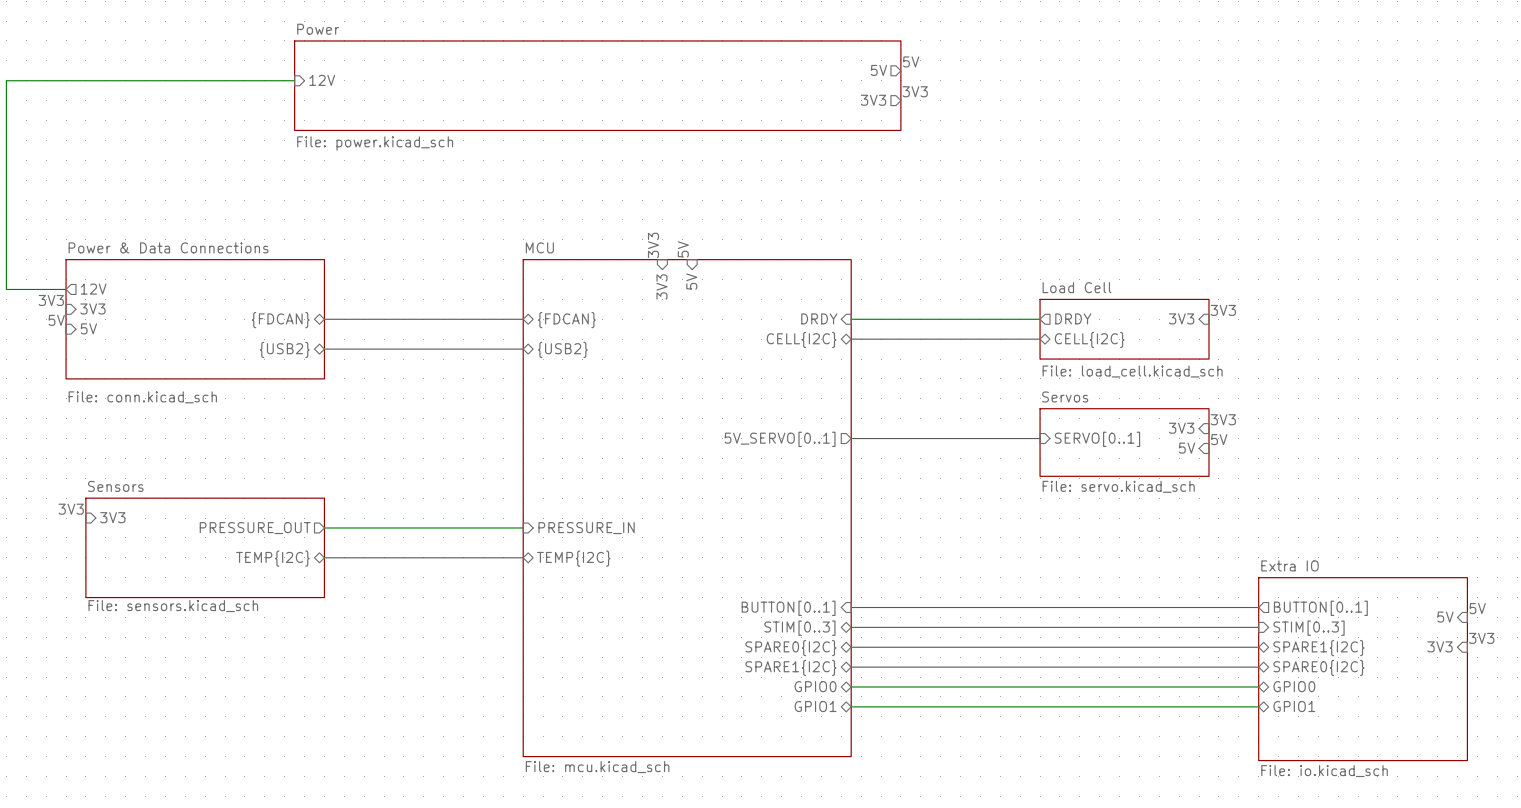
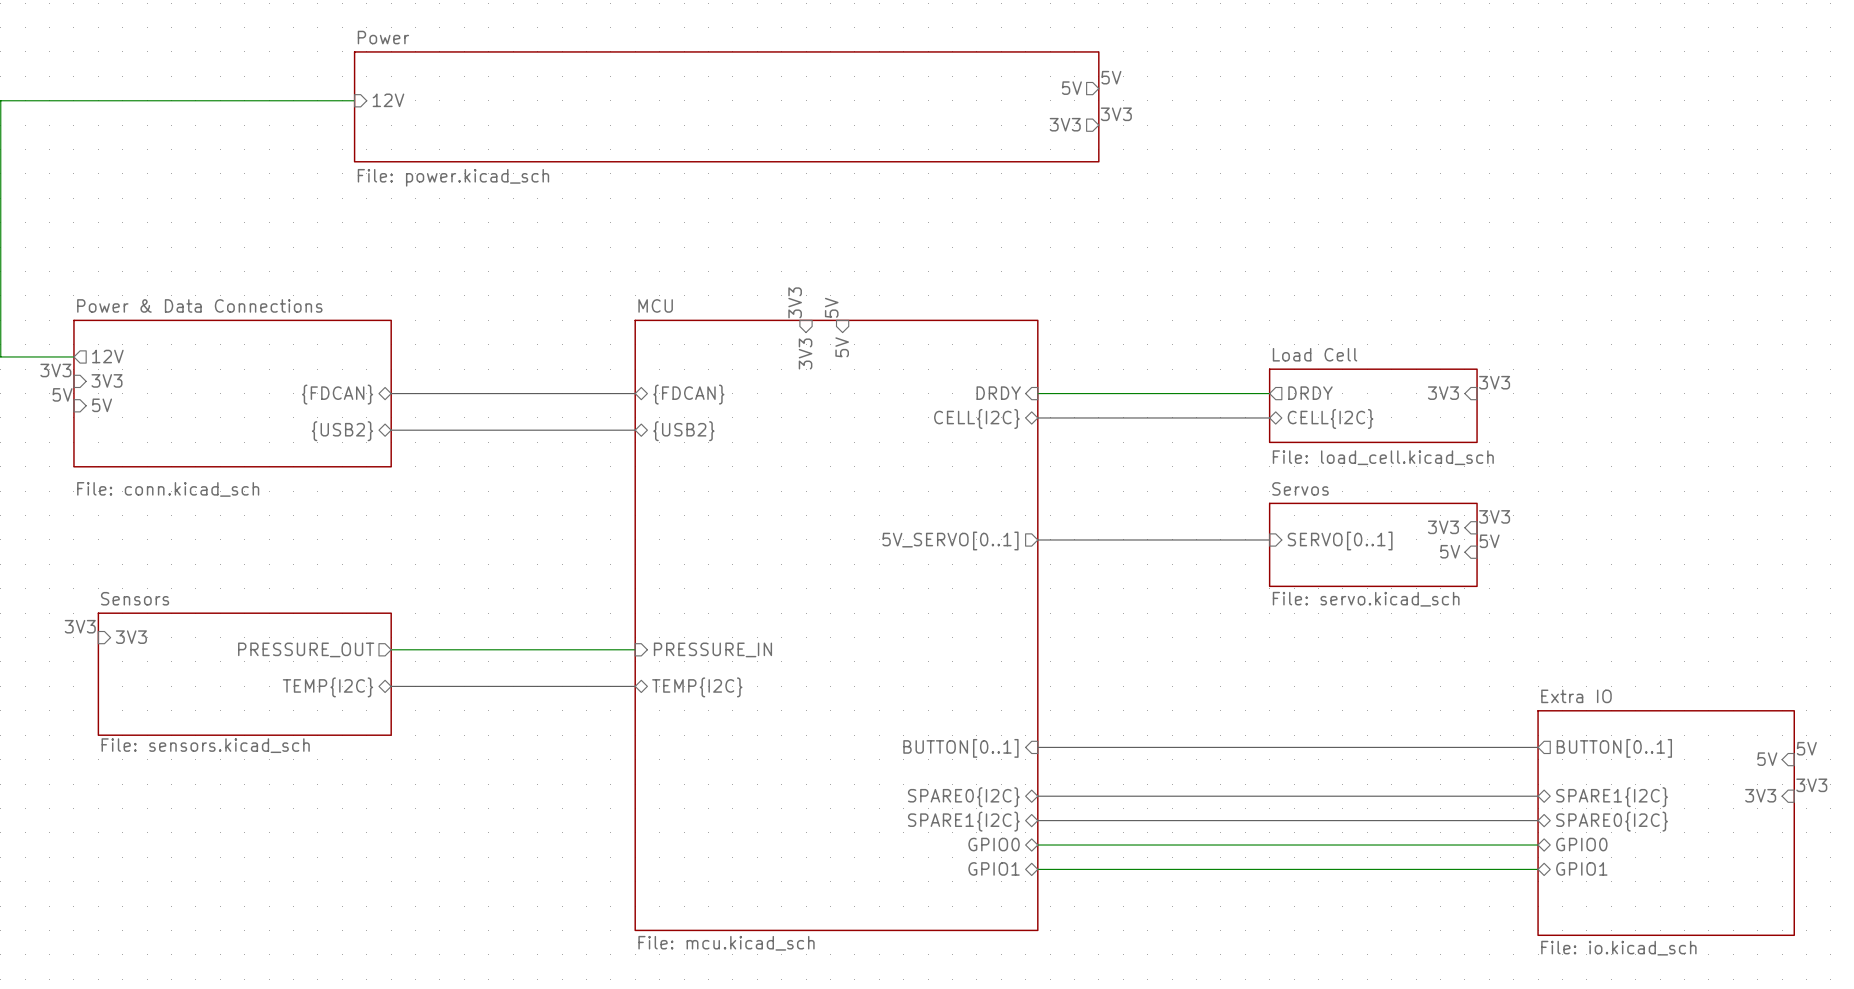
bus: (851, 627) (1258, 627) -> none
sheet pin: STIM[0..3] (799, 628) -> none
sheet pin: STIM[0..3] (1309, 628) -> none

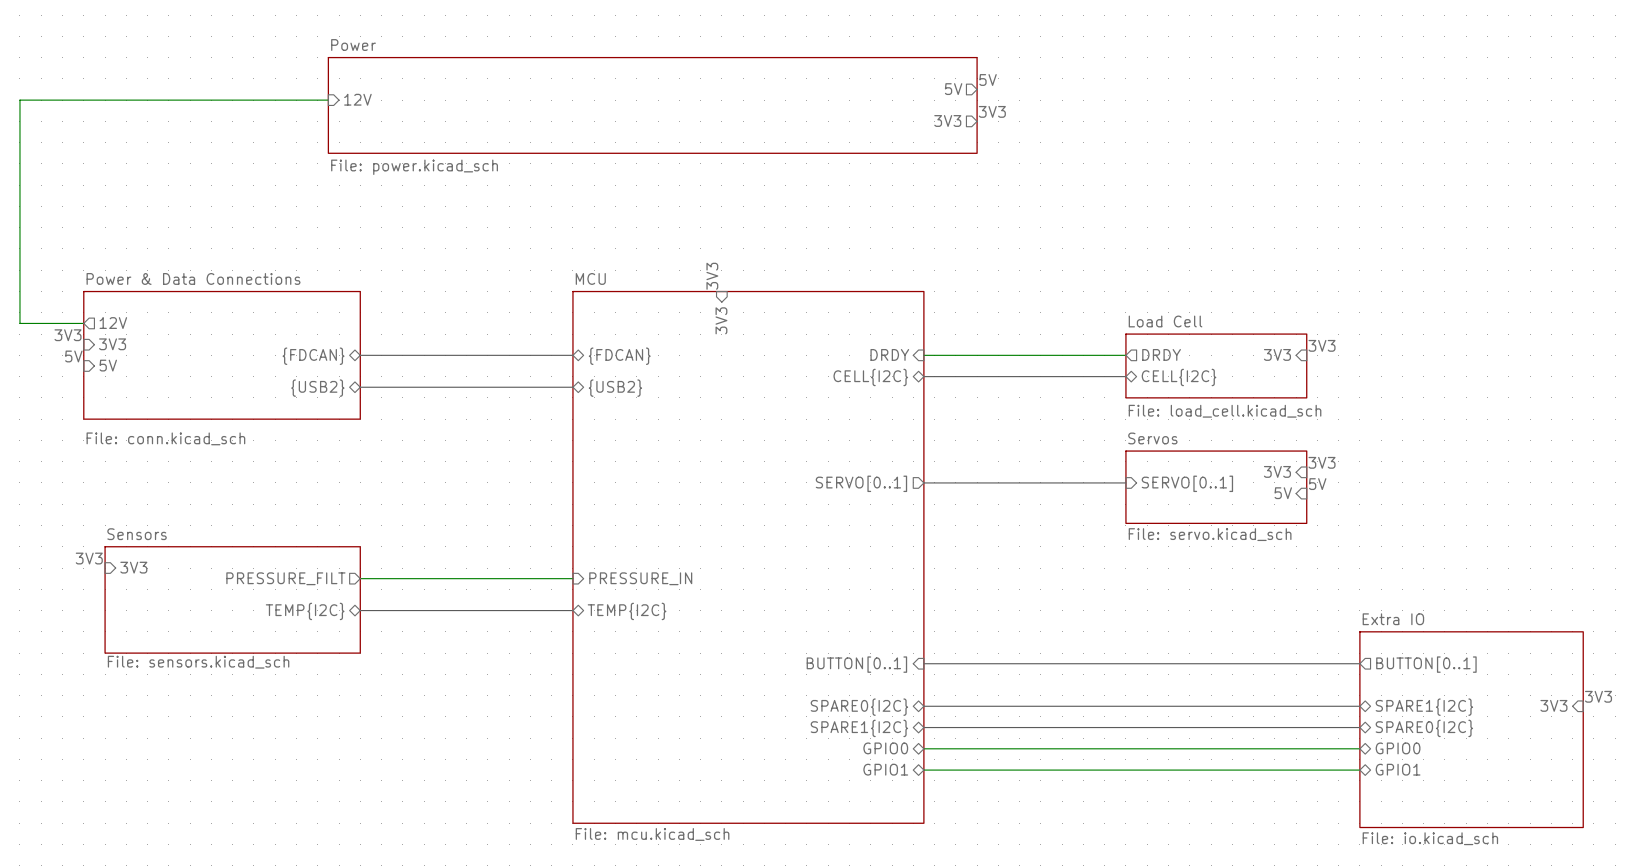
label: 5V (831, 307) -> none
sheet pin: 5V (842, 347) -> none
sheet pin: 5V_SERVO[0..1] (950, 540) -> SERVO[0..1] (861, 483)
sheet pin: PRESSURE_OUT (306, 649) -> PRESSURE_FILT (285, 578)
label: 5V (1806, 748) -> none
sheet pin: 5V (1767, 759) -> none

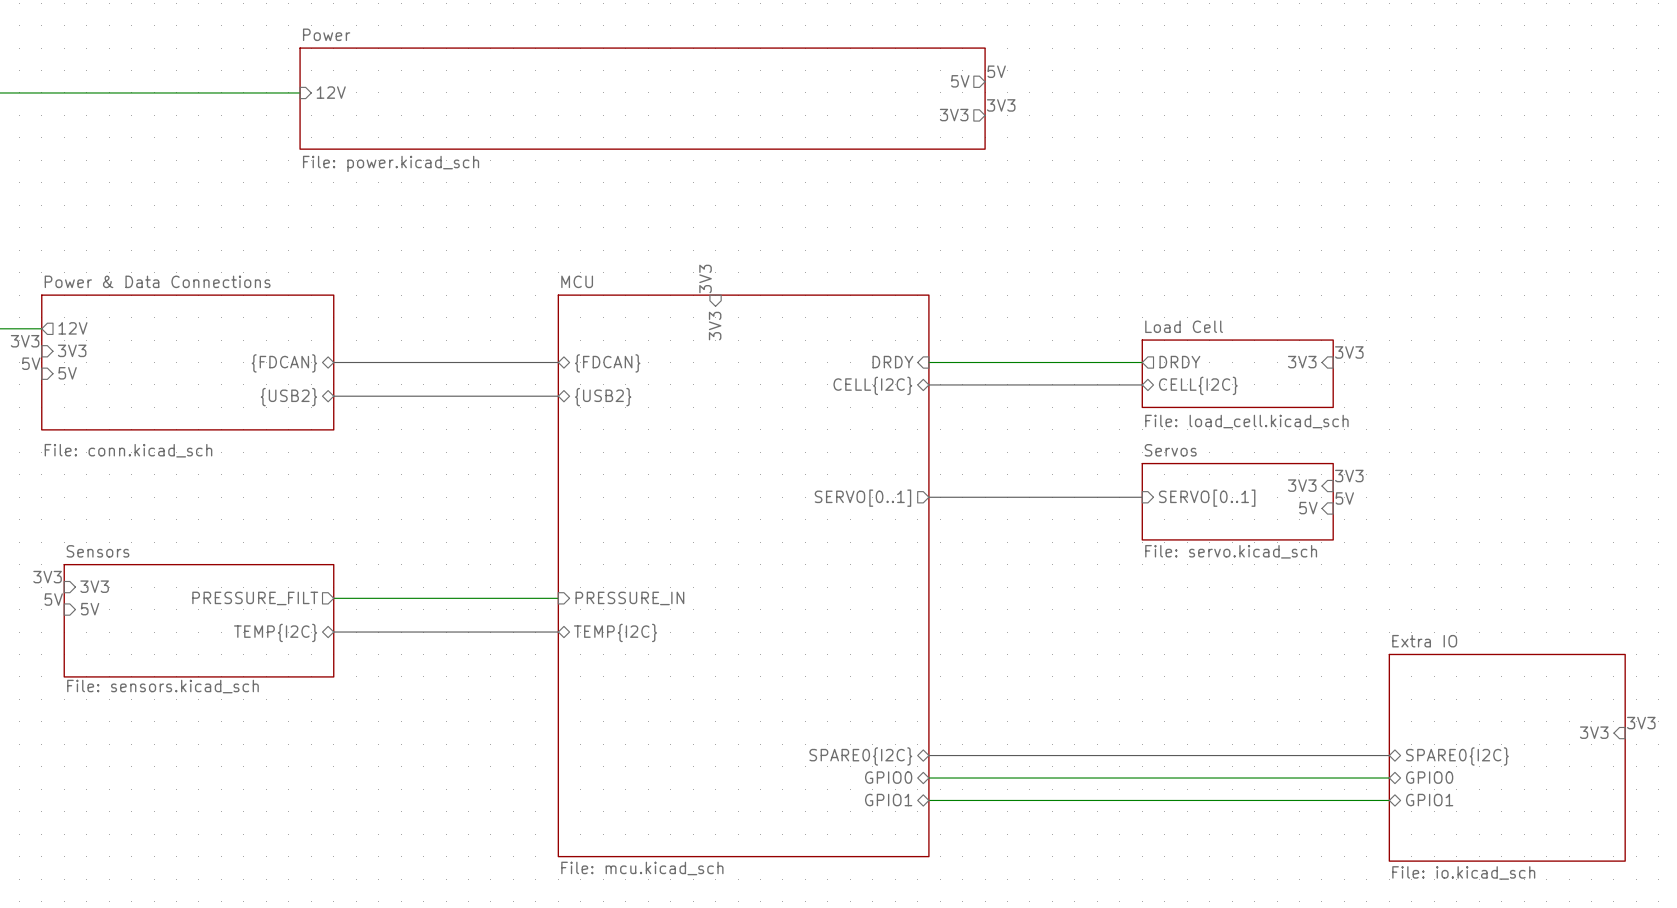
label: none -> 5V (53, 599)
sheet pin: none -> 5V (90, 609)
bus: (923, 663) (1359, 663) -> none
sheet pin: BUTTON[0..1] (856, 664) -> none
sheet pin: BUTTON[0..1] (1426, 664) -> none
bus: (923, 706) (1359, 706) -> none
sheet pin: SPARE0{I2C} (859, 707) -> none
sheet pin: SPARE1{I2C} (1424, 707) -> none
sheet pin: SPARE1{I2C} (859, 728) -> SPARE0{I2C} (860, 756)

